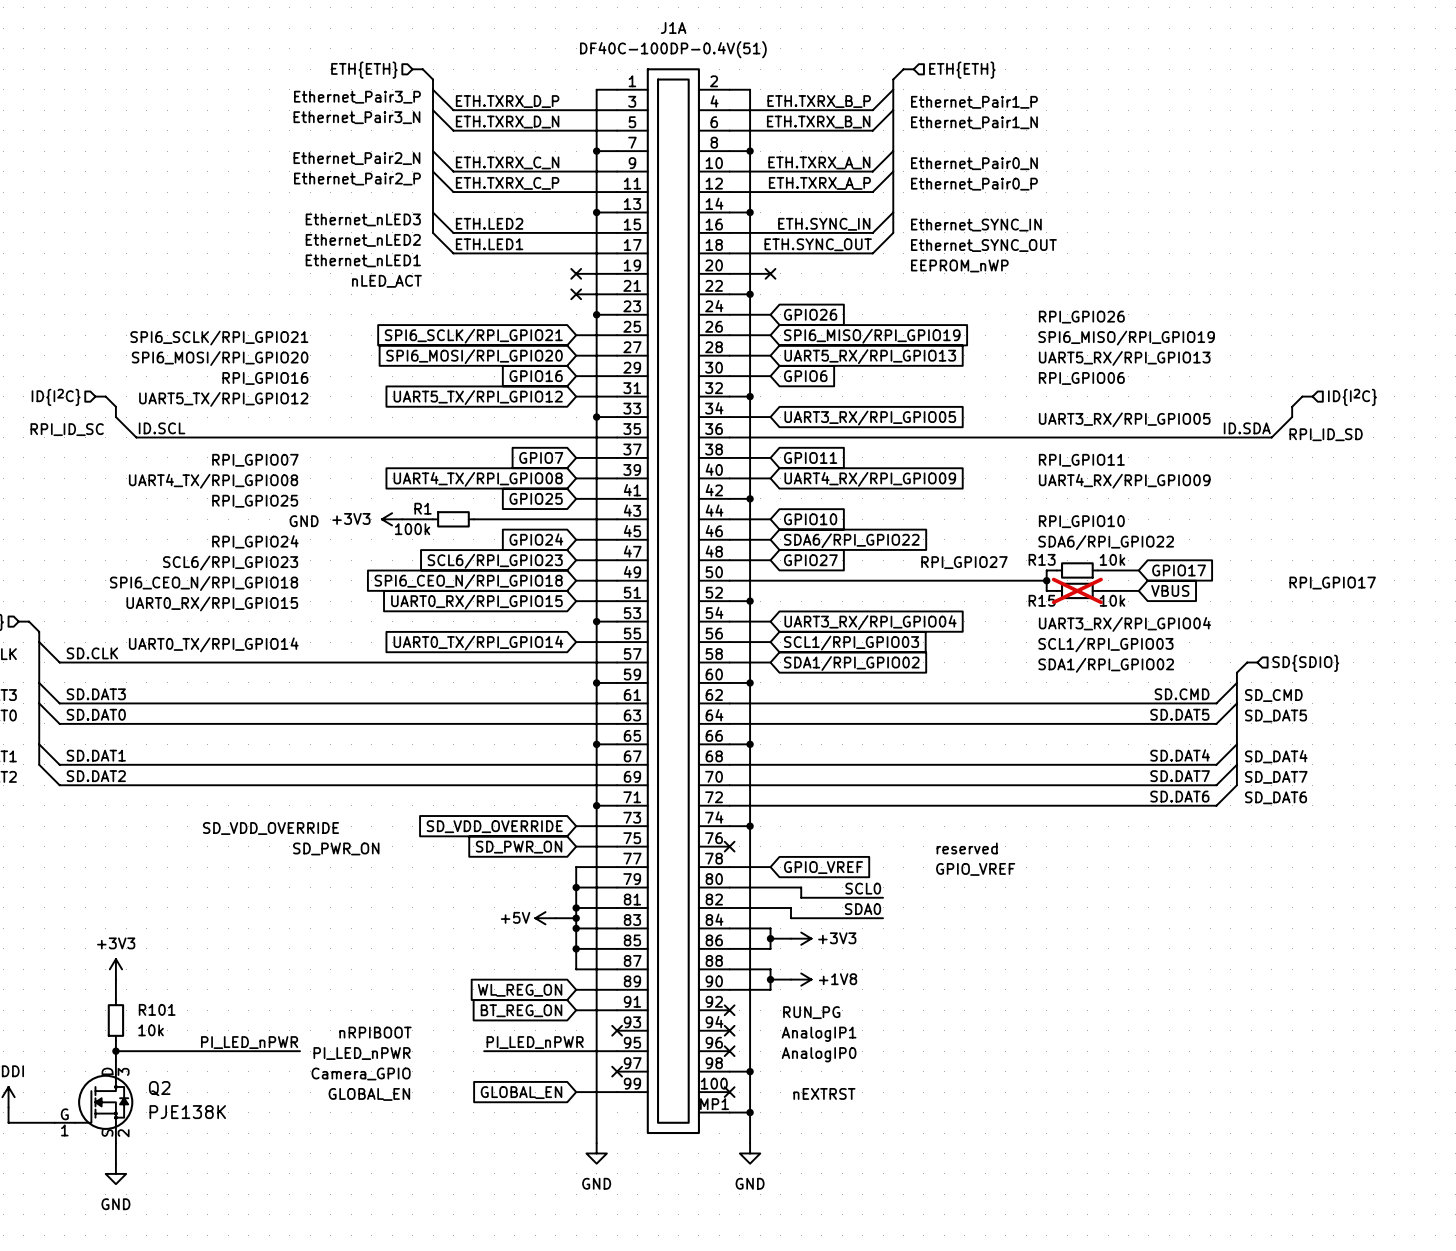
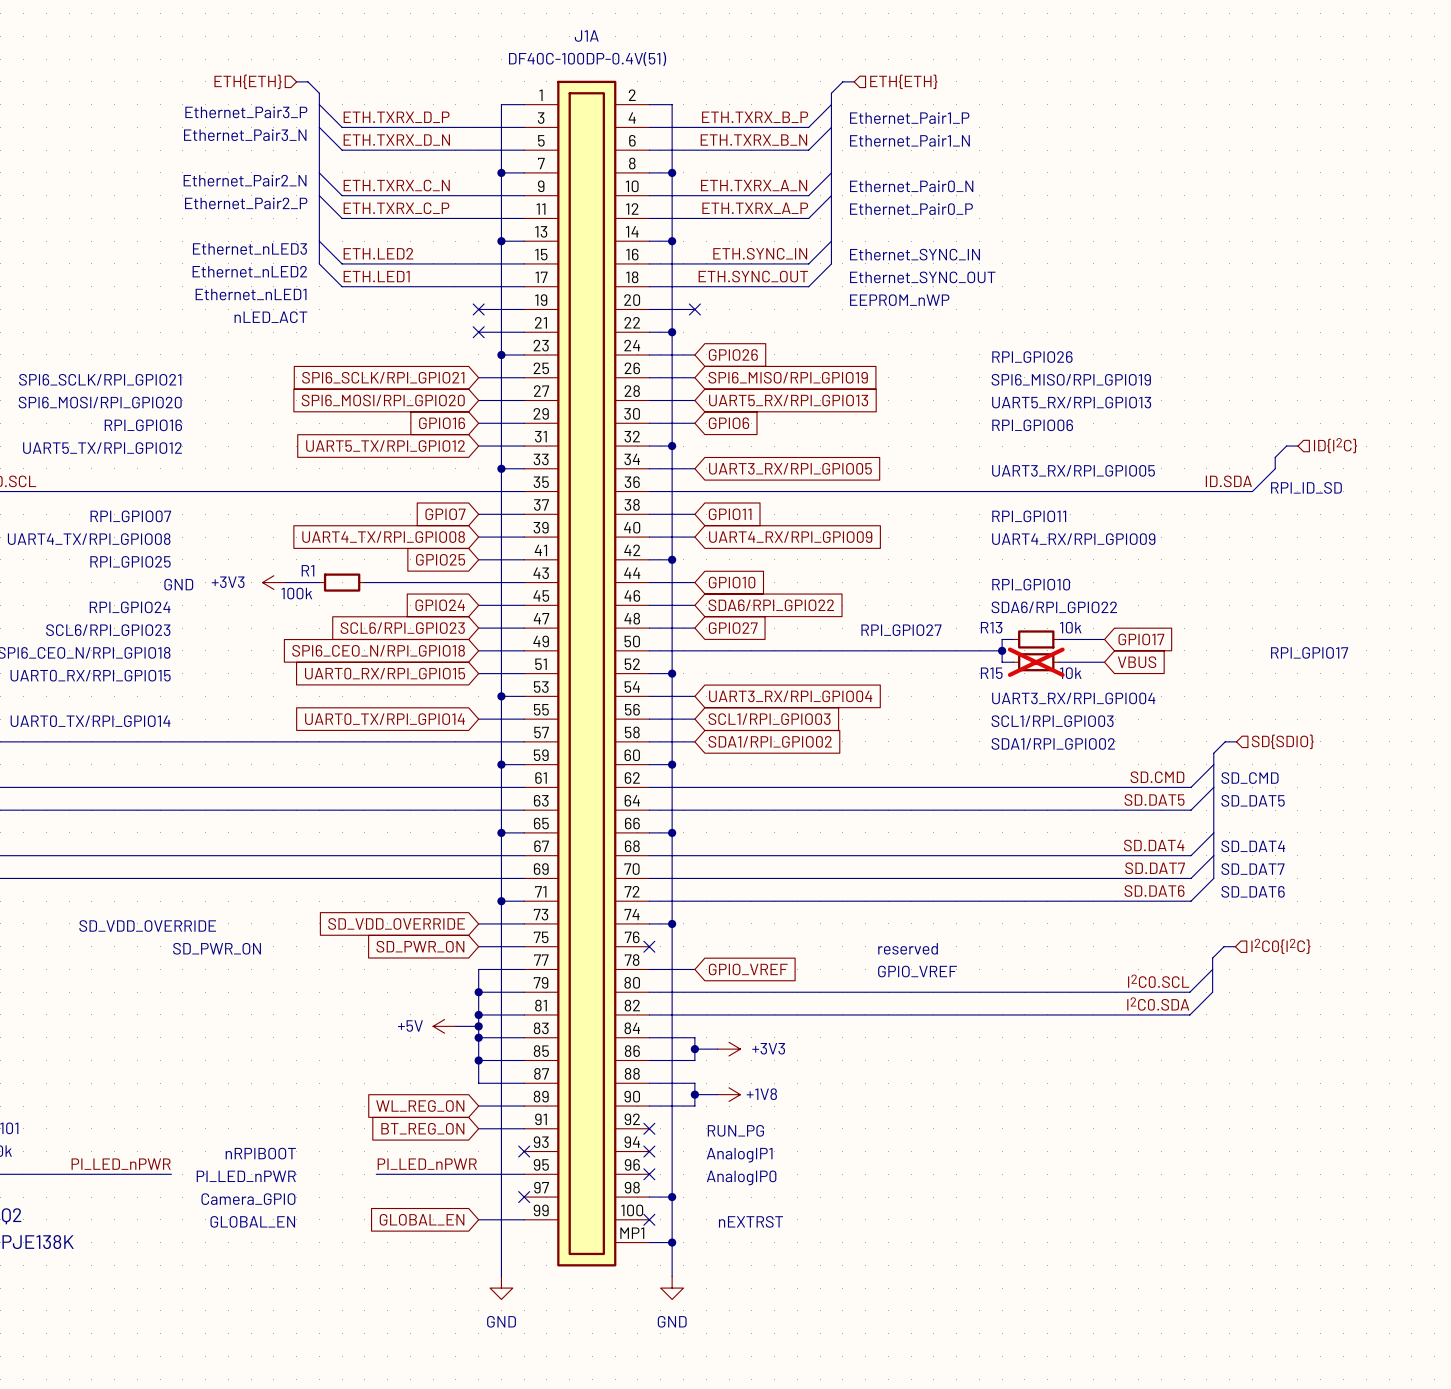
bus: none -> (1235, 946) (1224, 946) (1212, 958) (1212, 992)
hierarchical label: none -> I2C0{I2C} (1280, 946)
label: none -> I2C0.SCL (1158, 981)
wire: (801, 887) (801, 897) (883, 897) -> (729, 992) (1189, 992) (1212, 969)
label: SCL0 (863, 888) -> none
label: none -> I2C0.SDA (1158, 1004)
wire: (790, 907) (790, 918) (883, 918) -> (717, 1014) (1189, 1014) (1212, 992)
label: SDA0 (862, 909) -> none

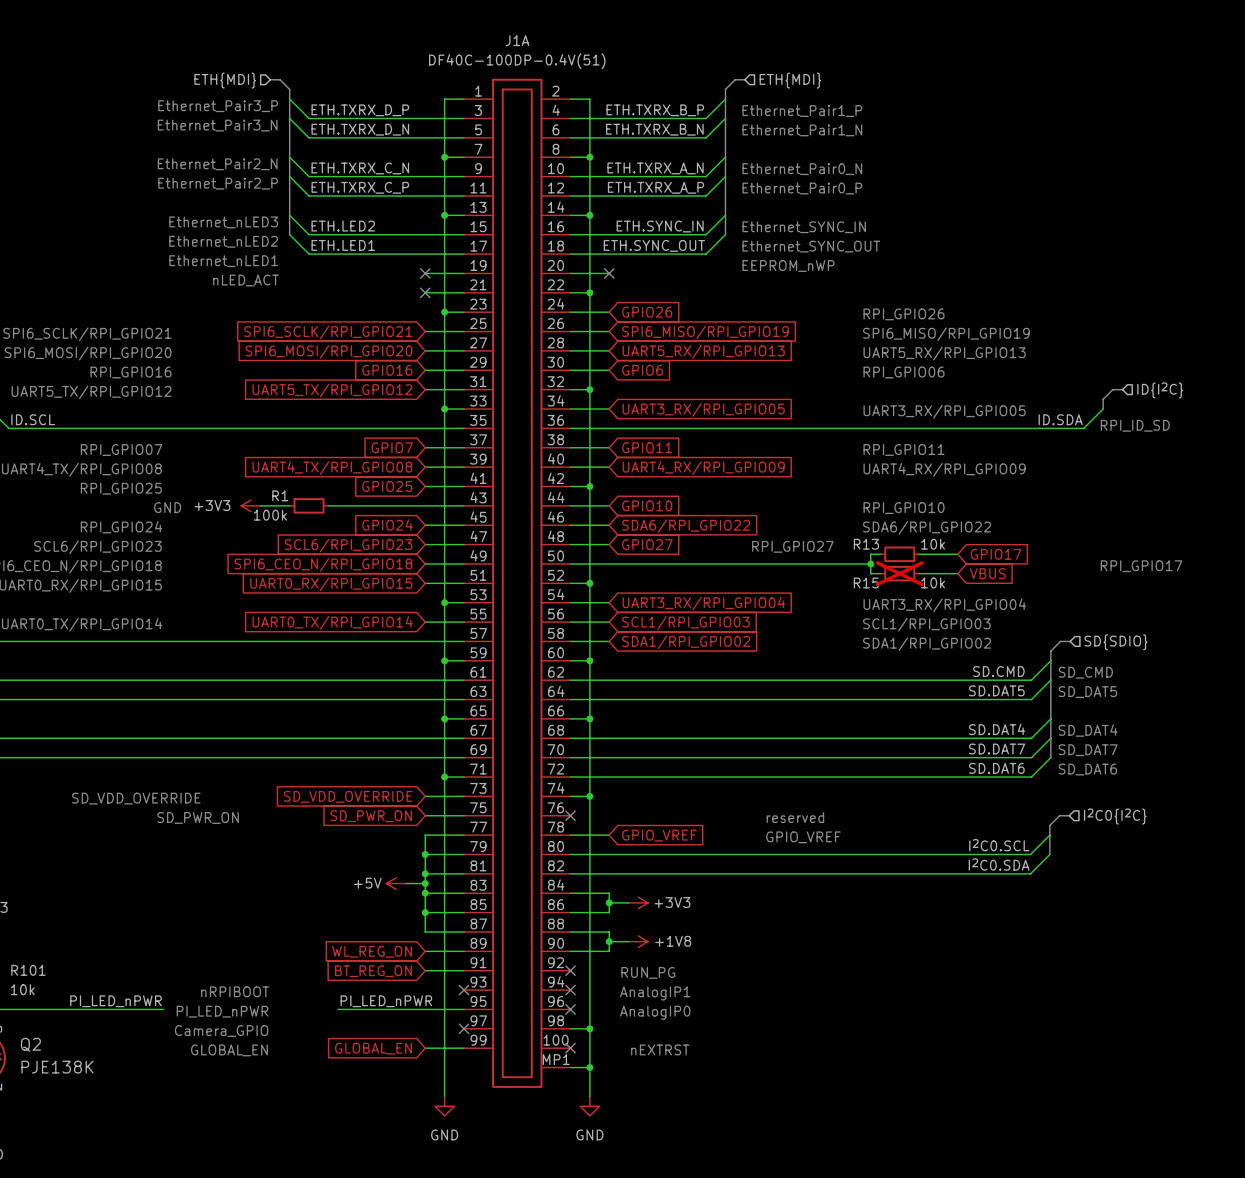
hierarchical label: ETH{ETH} (248, 81) -> ETH{MDI} (225, 80)
hierarchical label: ETH{ETH} (903, 81) -> ETH{MDI} (790, 80)

